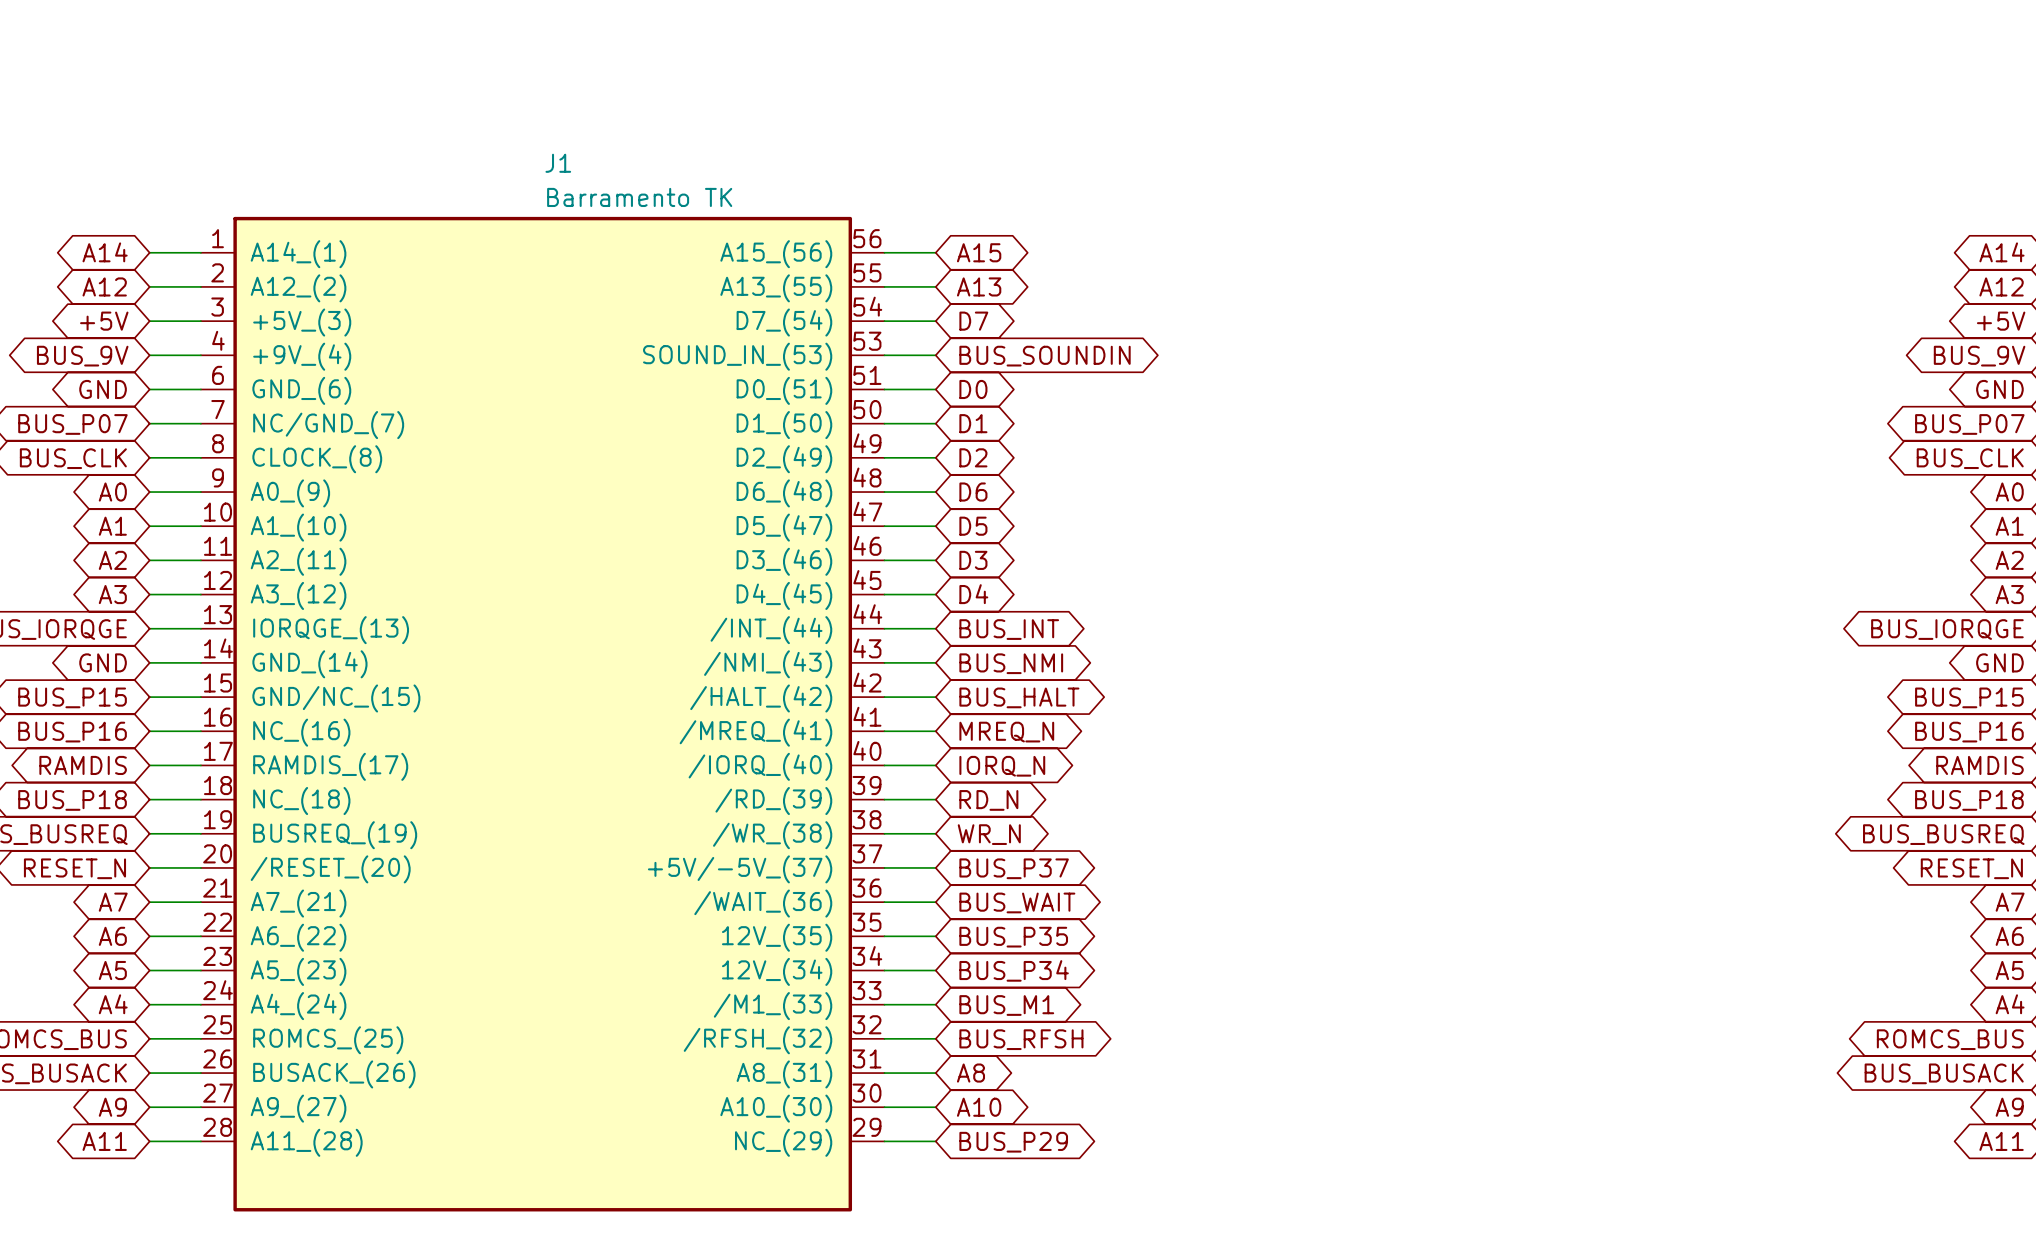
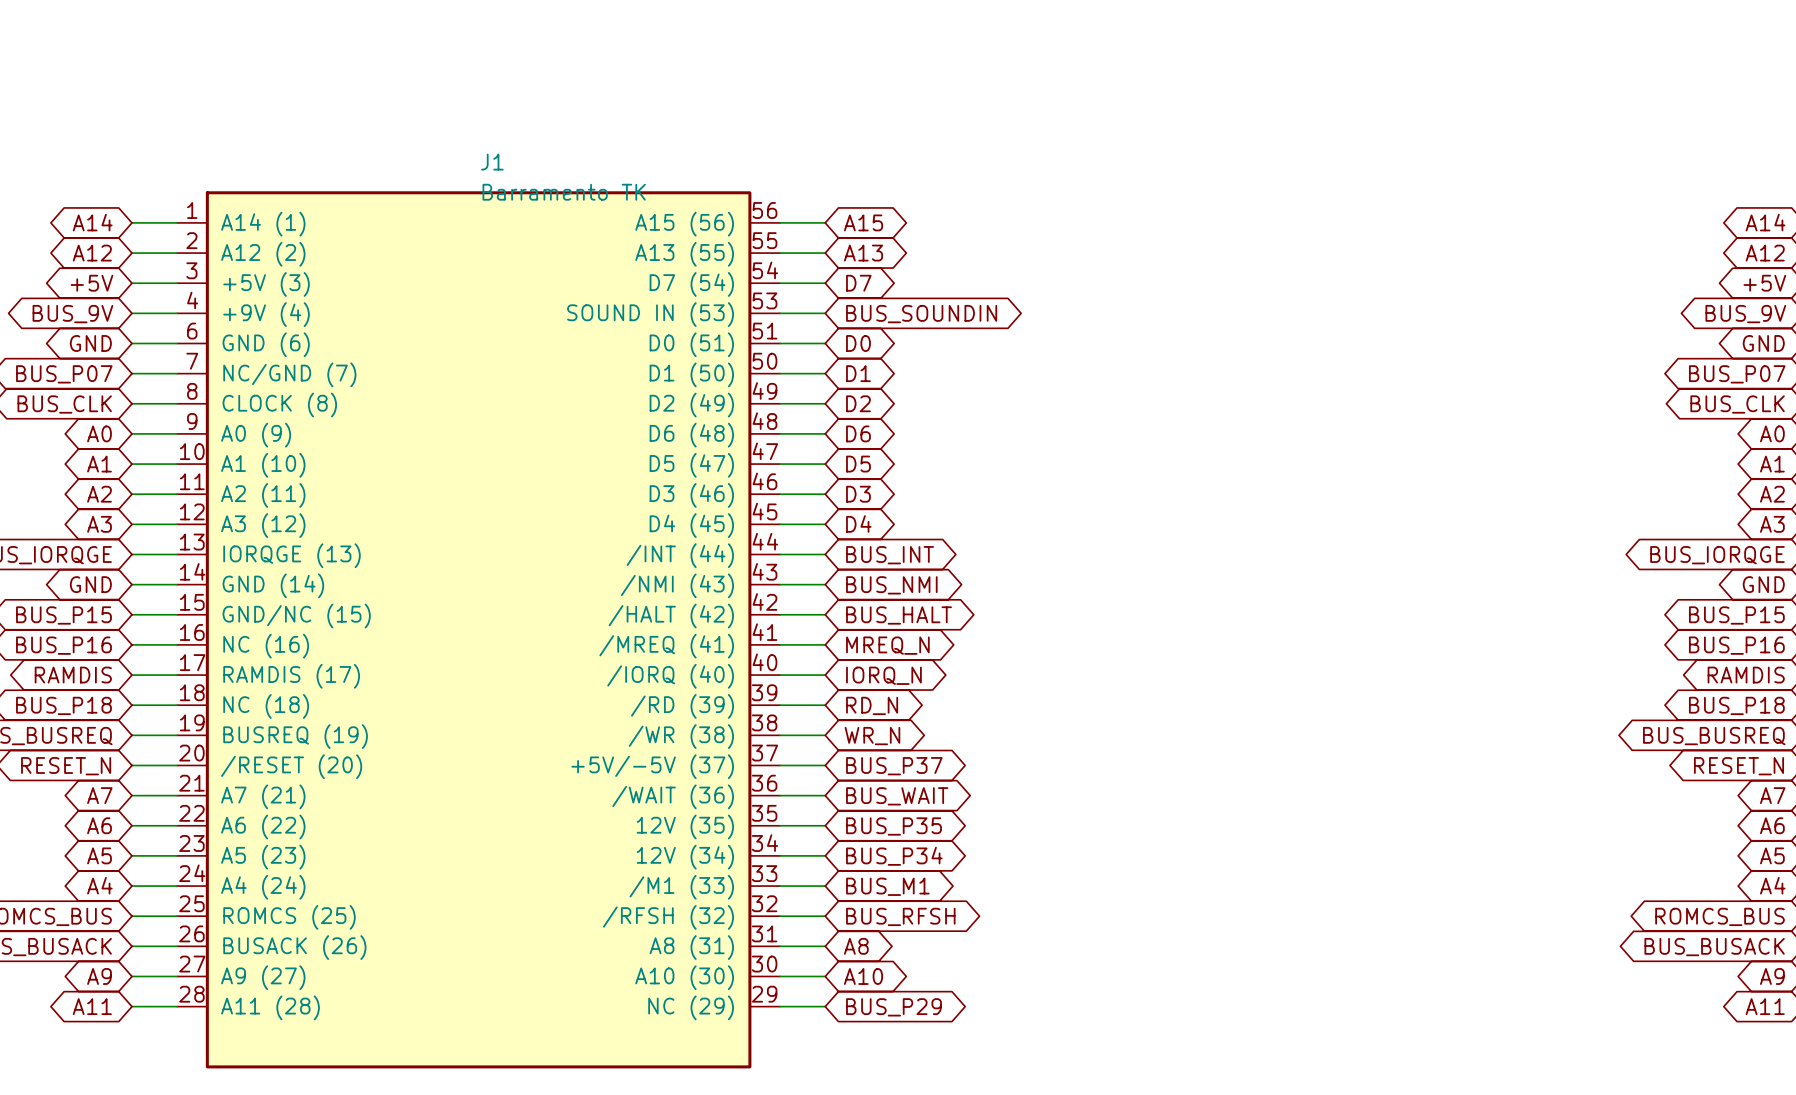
J1 symbol: [200, 216, 885, 1212] -> [177, 191, 781, 1069]

